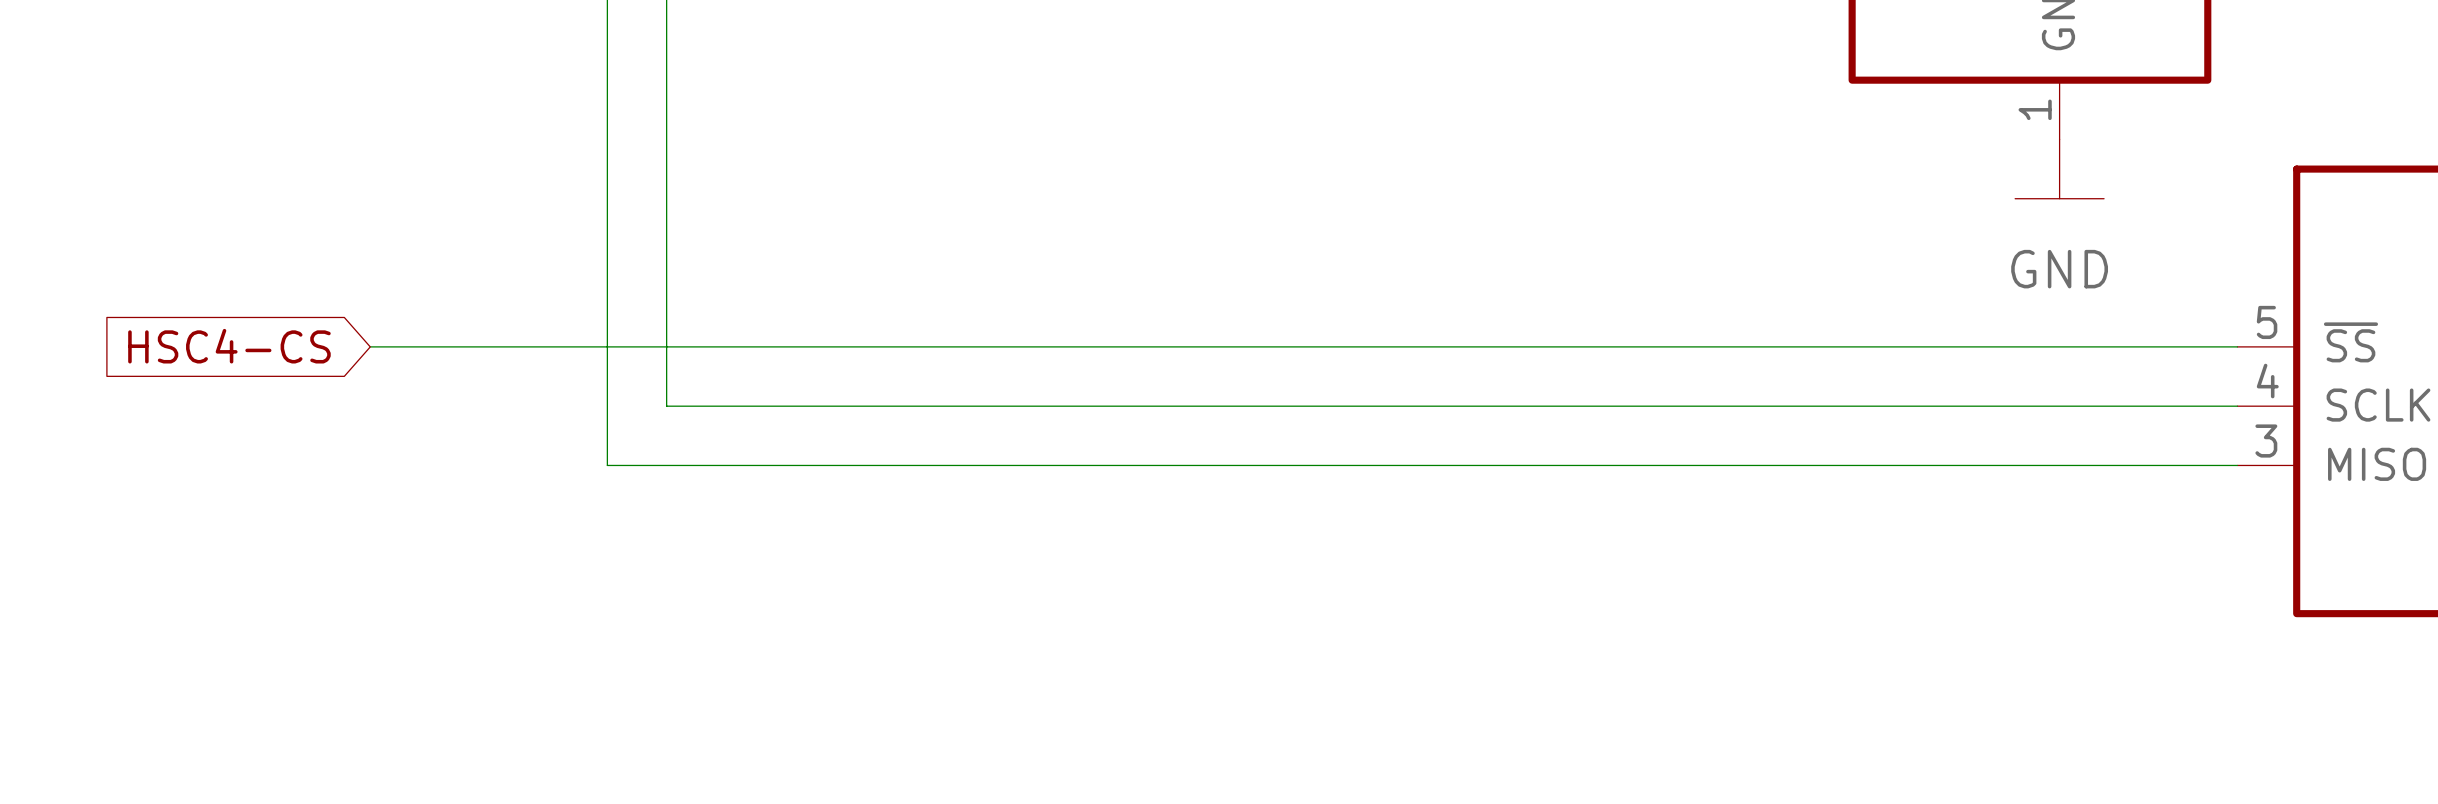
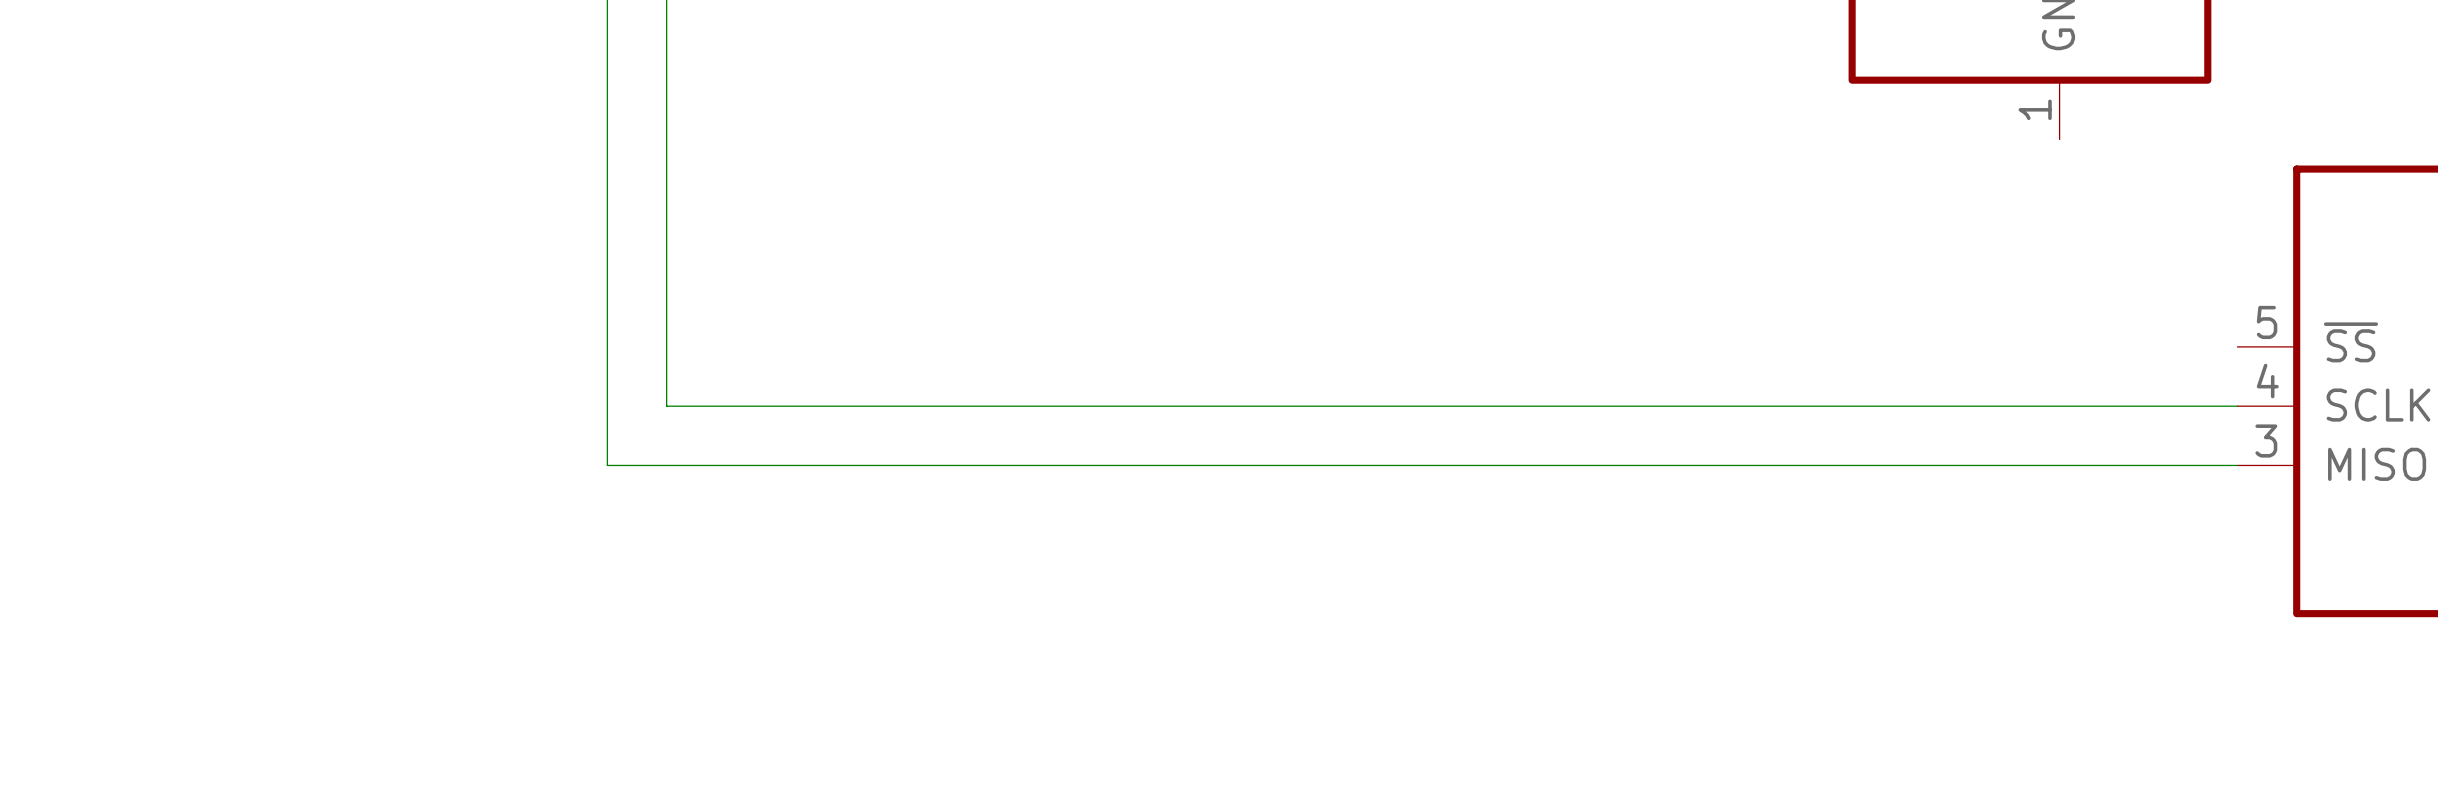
power symbol: GND (2059, 169) -> none
global label: HSC4-CS (229, 346) -> none
wire: (370, 346) (2237, 346) -> none

